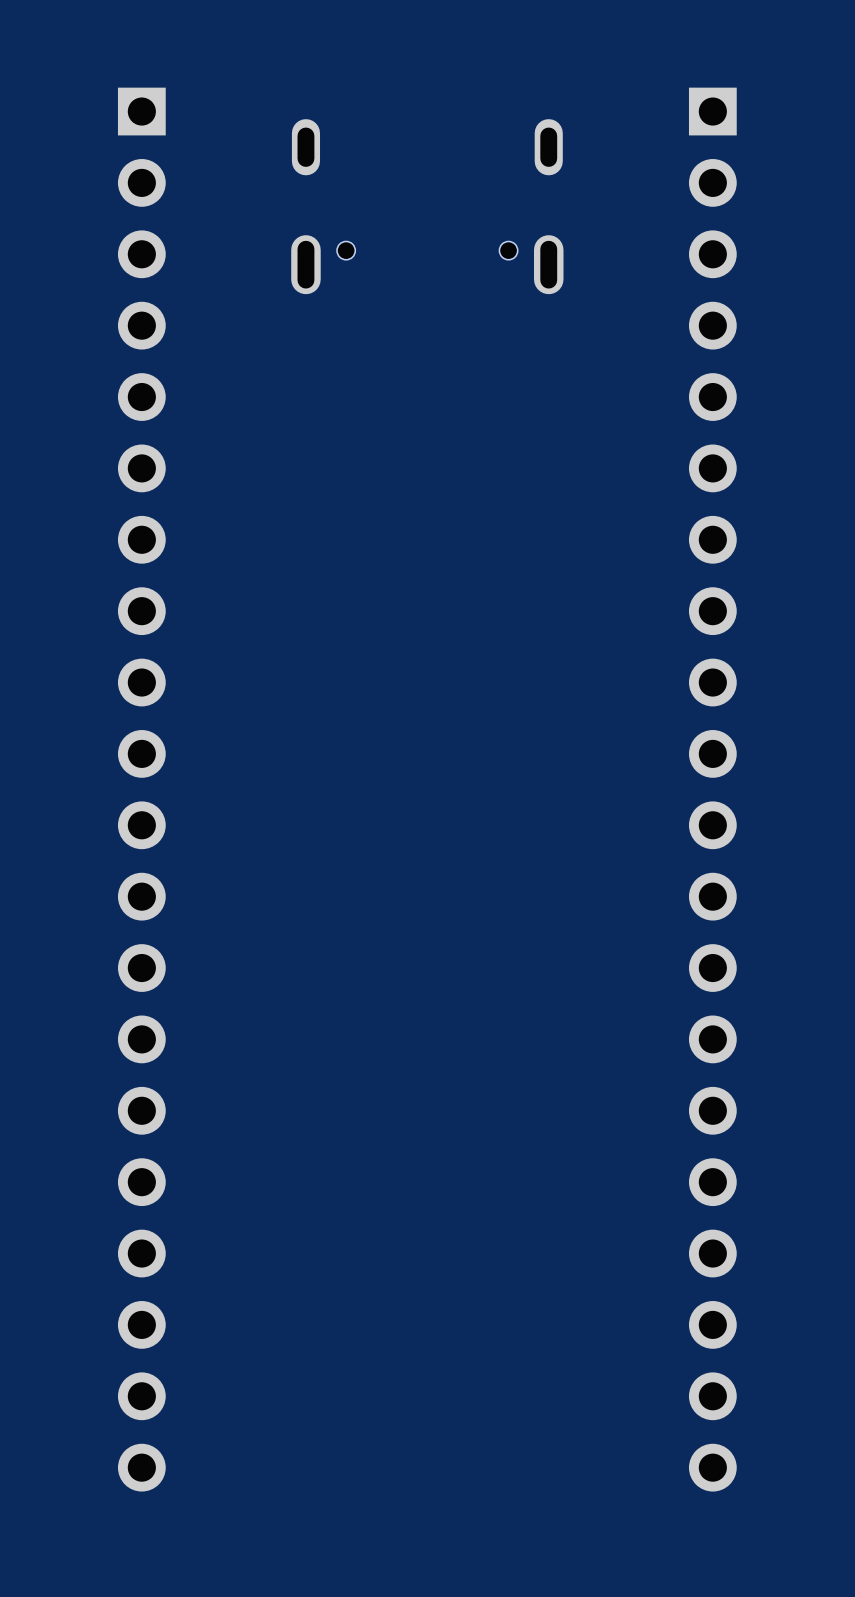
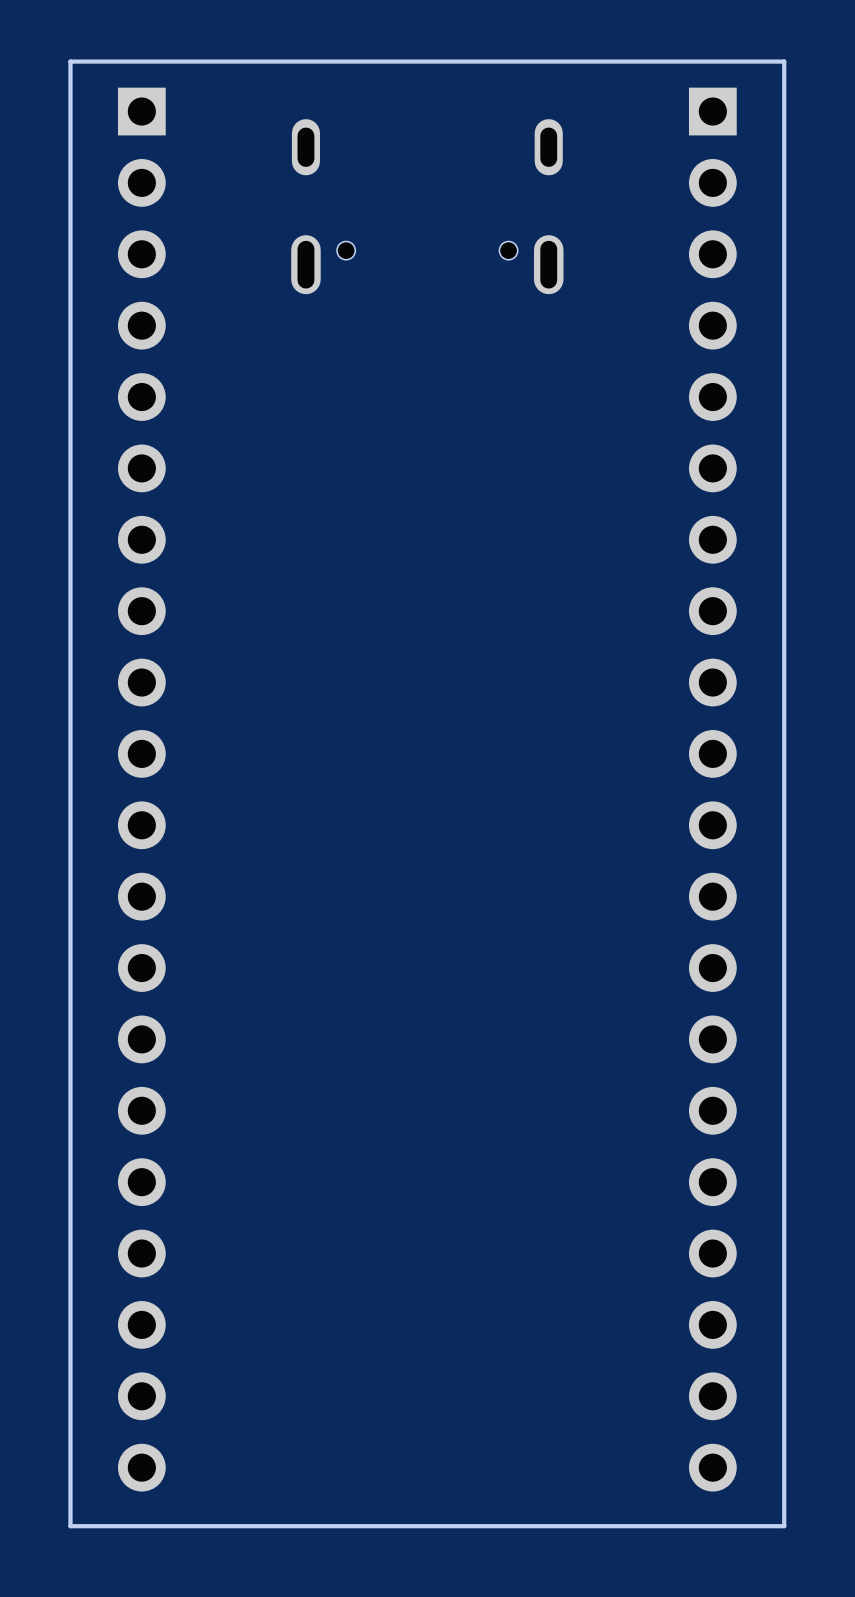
board edge: none -> (784, 61) (70, 61) (70, 1526) (784, 1526) (784, 61)

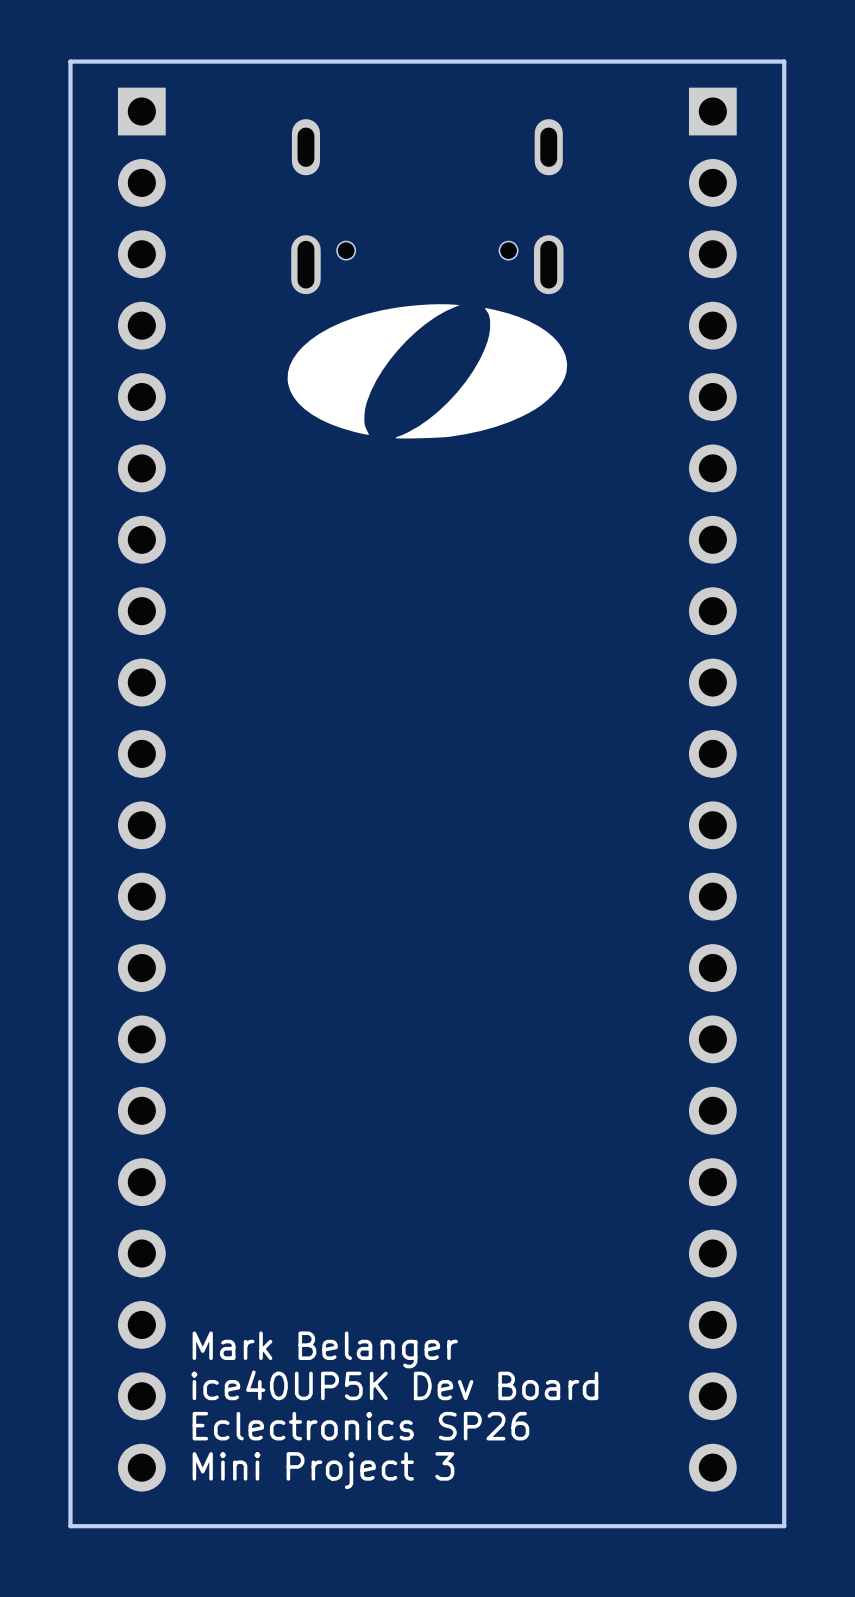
drawing: none -> [287, 304, 568, 439]
text: none -> Mark Belanger (325, 1349)
text: none -> ice40UP5K Dev Board (394, 1385)
text: none -> Eclectronics SP26 (360, 1426)
text: none -> Mini Project 3 (323, 1470)

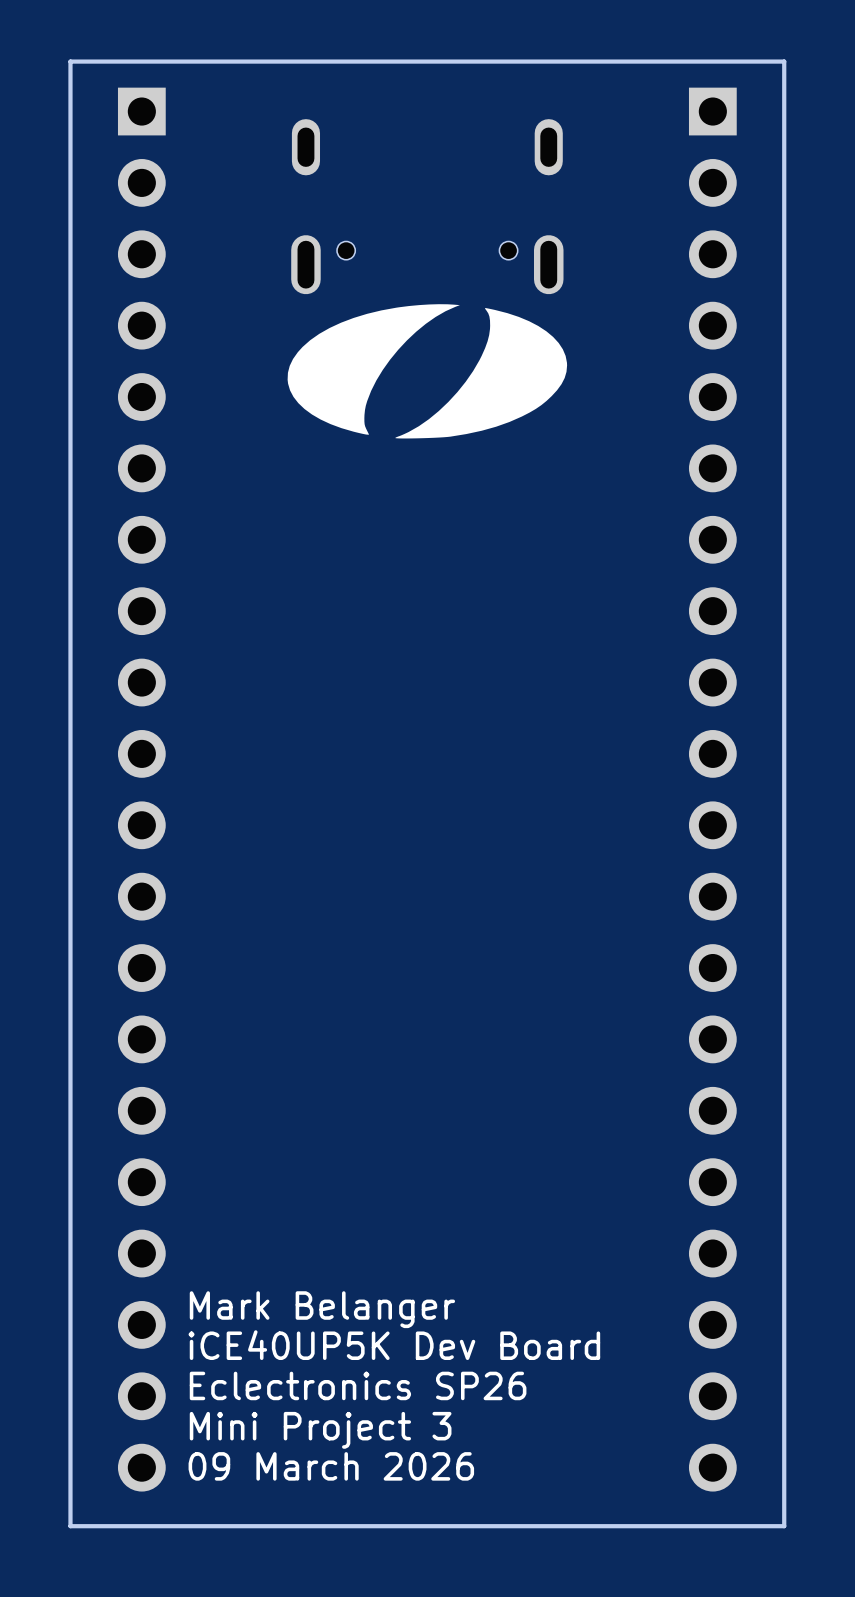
text position: Mark Belanger (325, 1349) -> Mark Belanger (322, 1309)
text: ice40UP5K Dev Board (394, 1385) -> iCE40UP5K Dev Board (394, 1345)
text position: Eclectronics SP26 (360, 1426) -> Eclectronics SP26 (358, 1385)
text: none -> 09 March 2026 (331, 1466)
text position: Mini Project 3 (323, 1470) -> Mini Project 3 (320, 1430)

